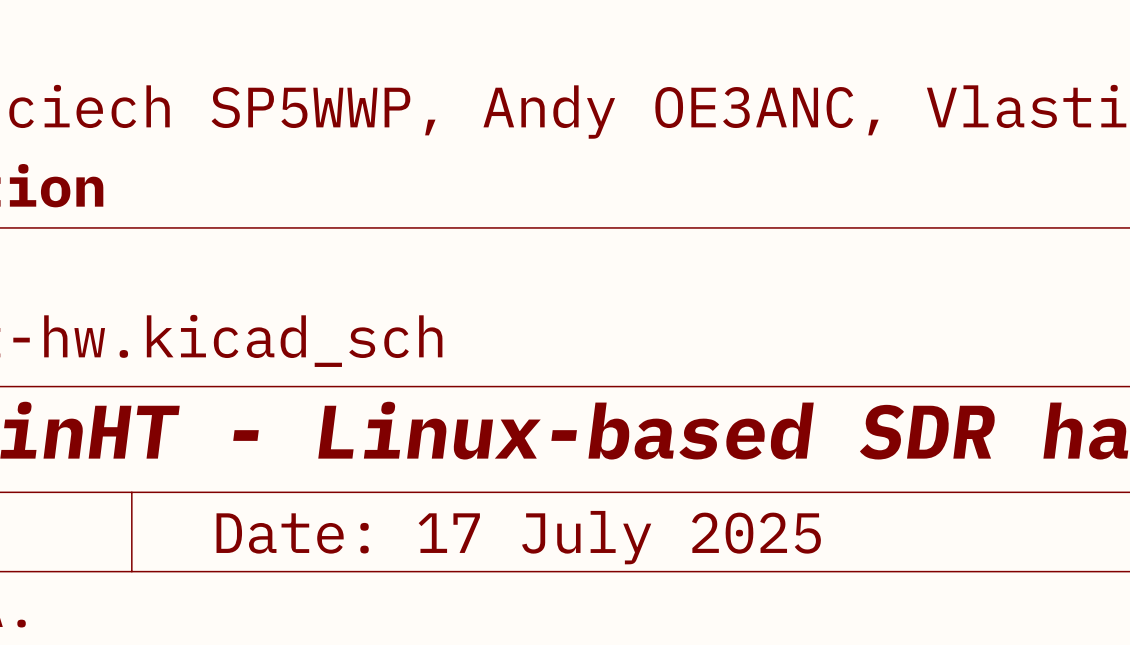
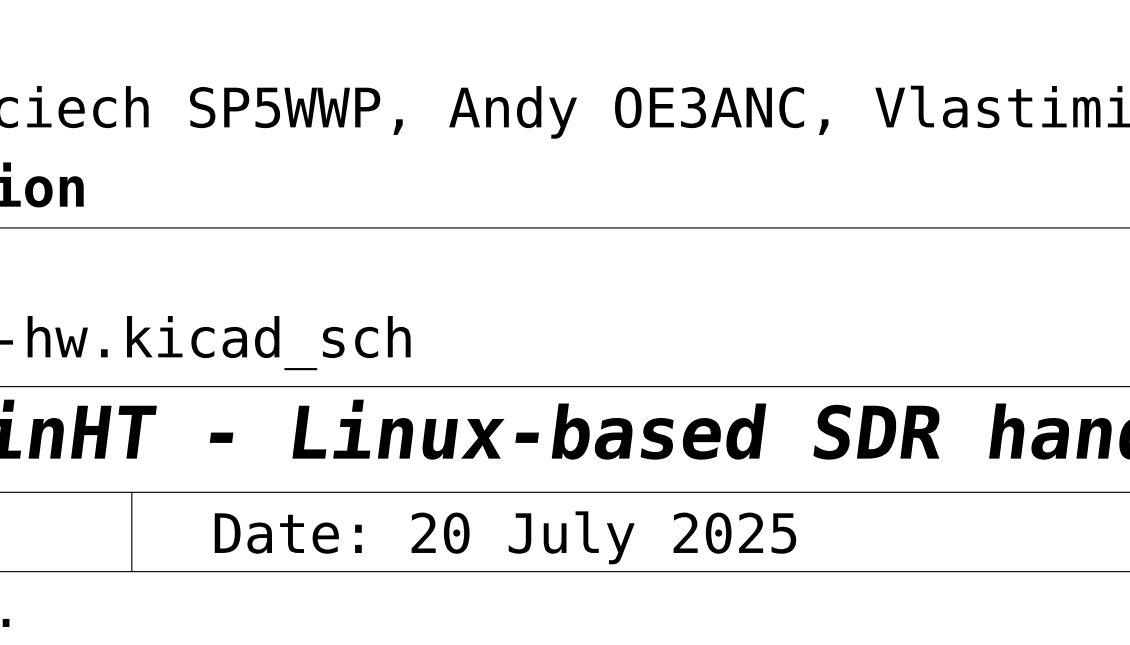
title block: Date: 17 July 2025 (518, 537) -> Date: 20 July 2025 (505, 537)

